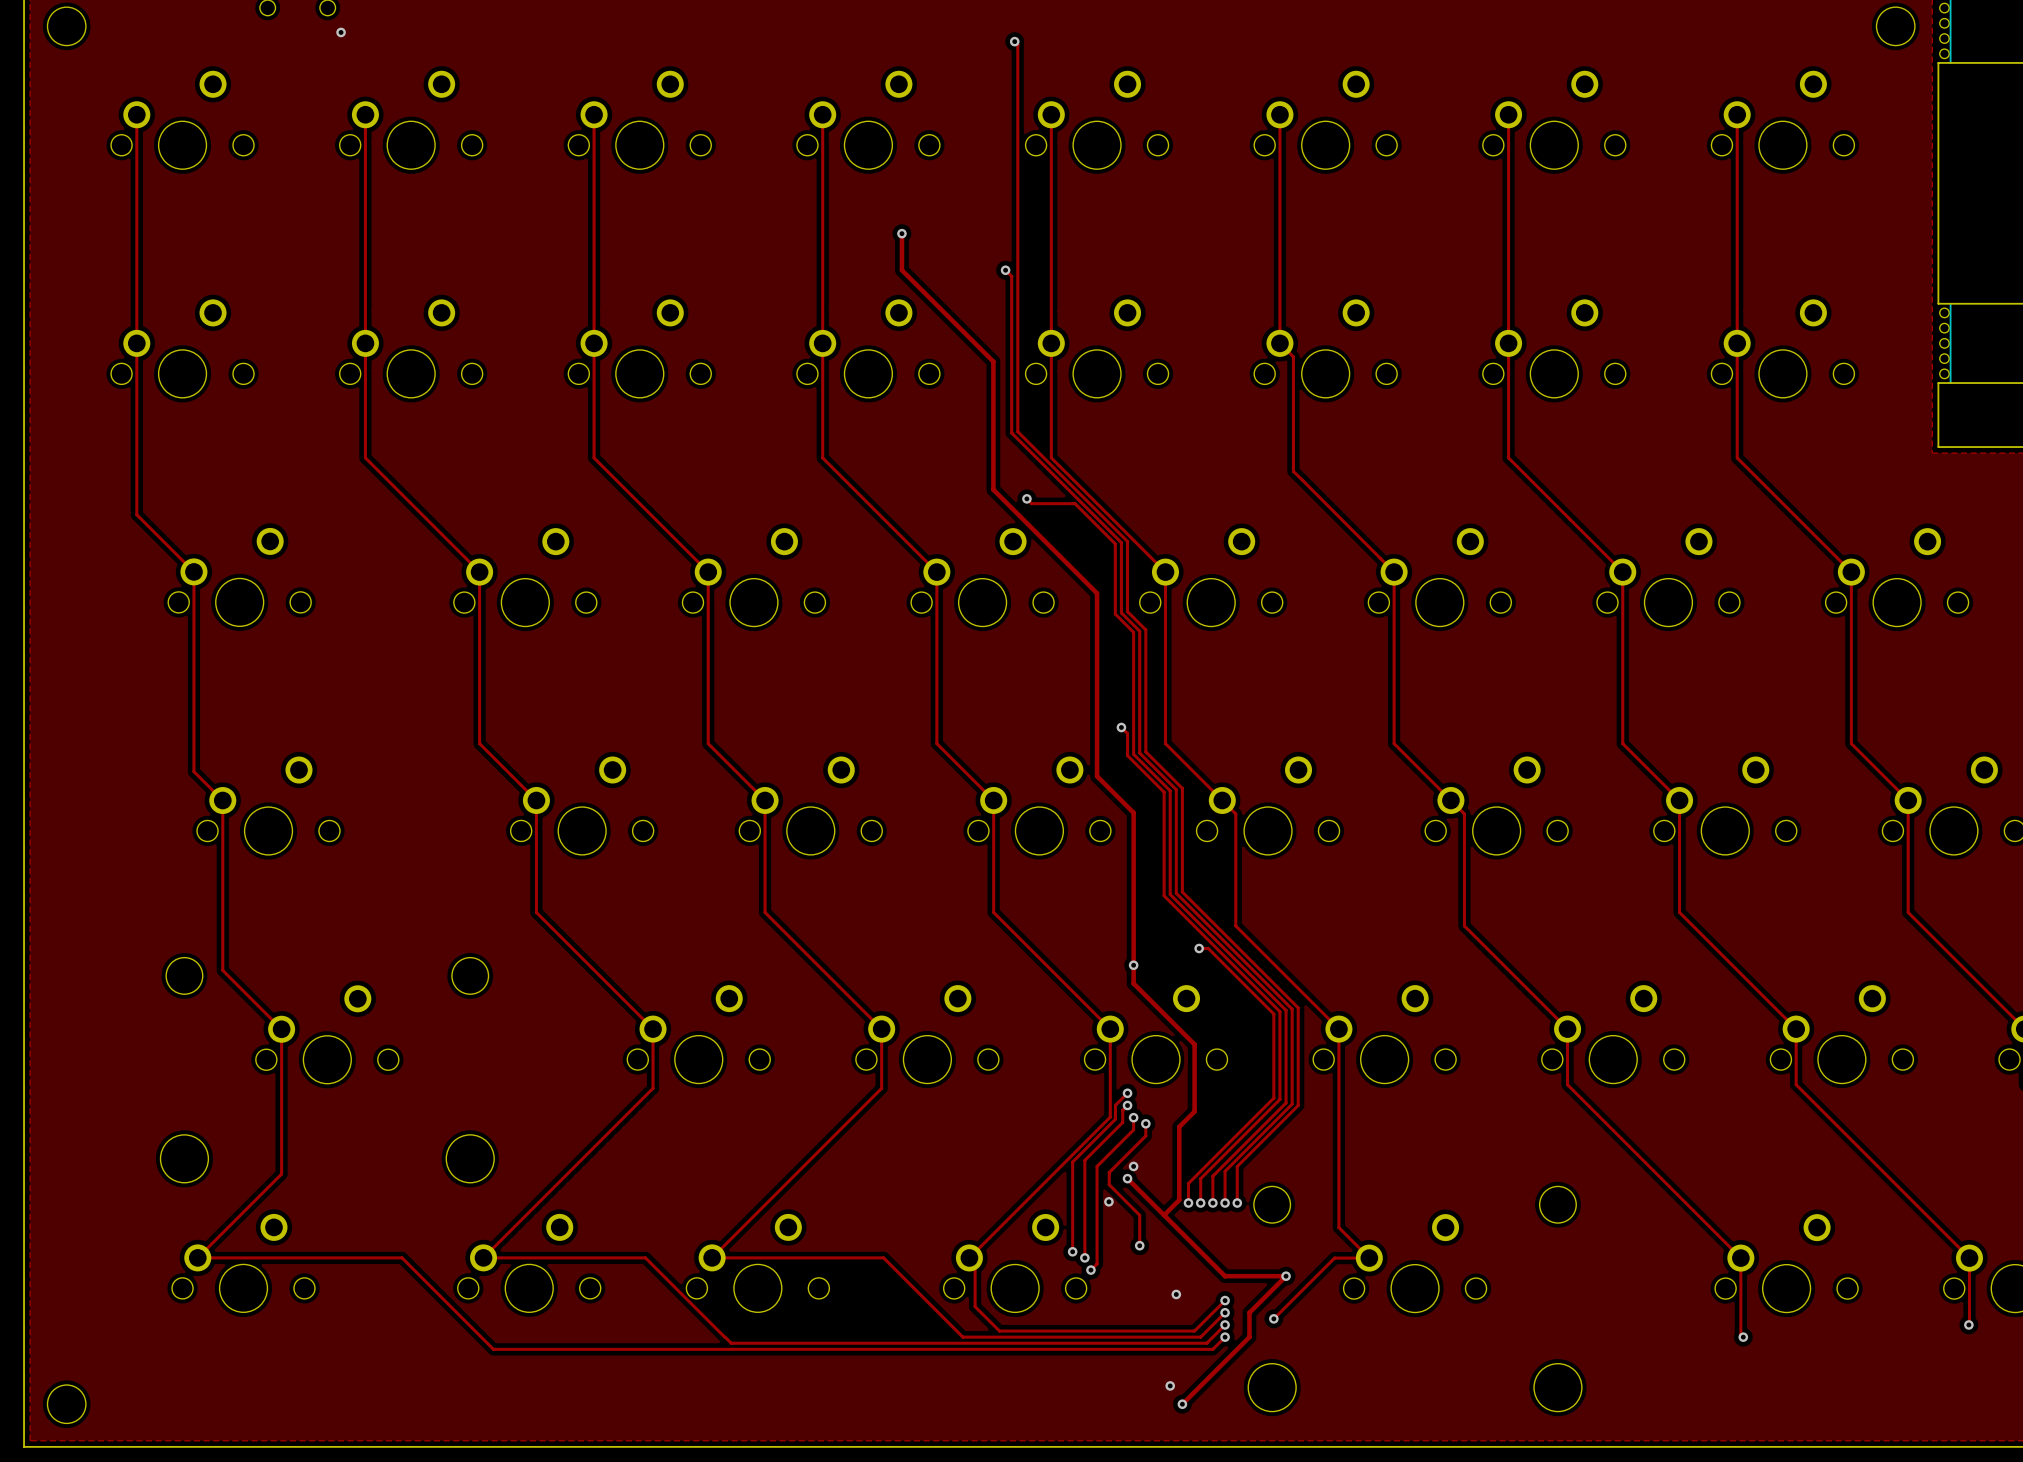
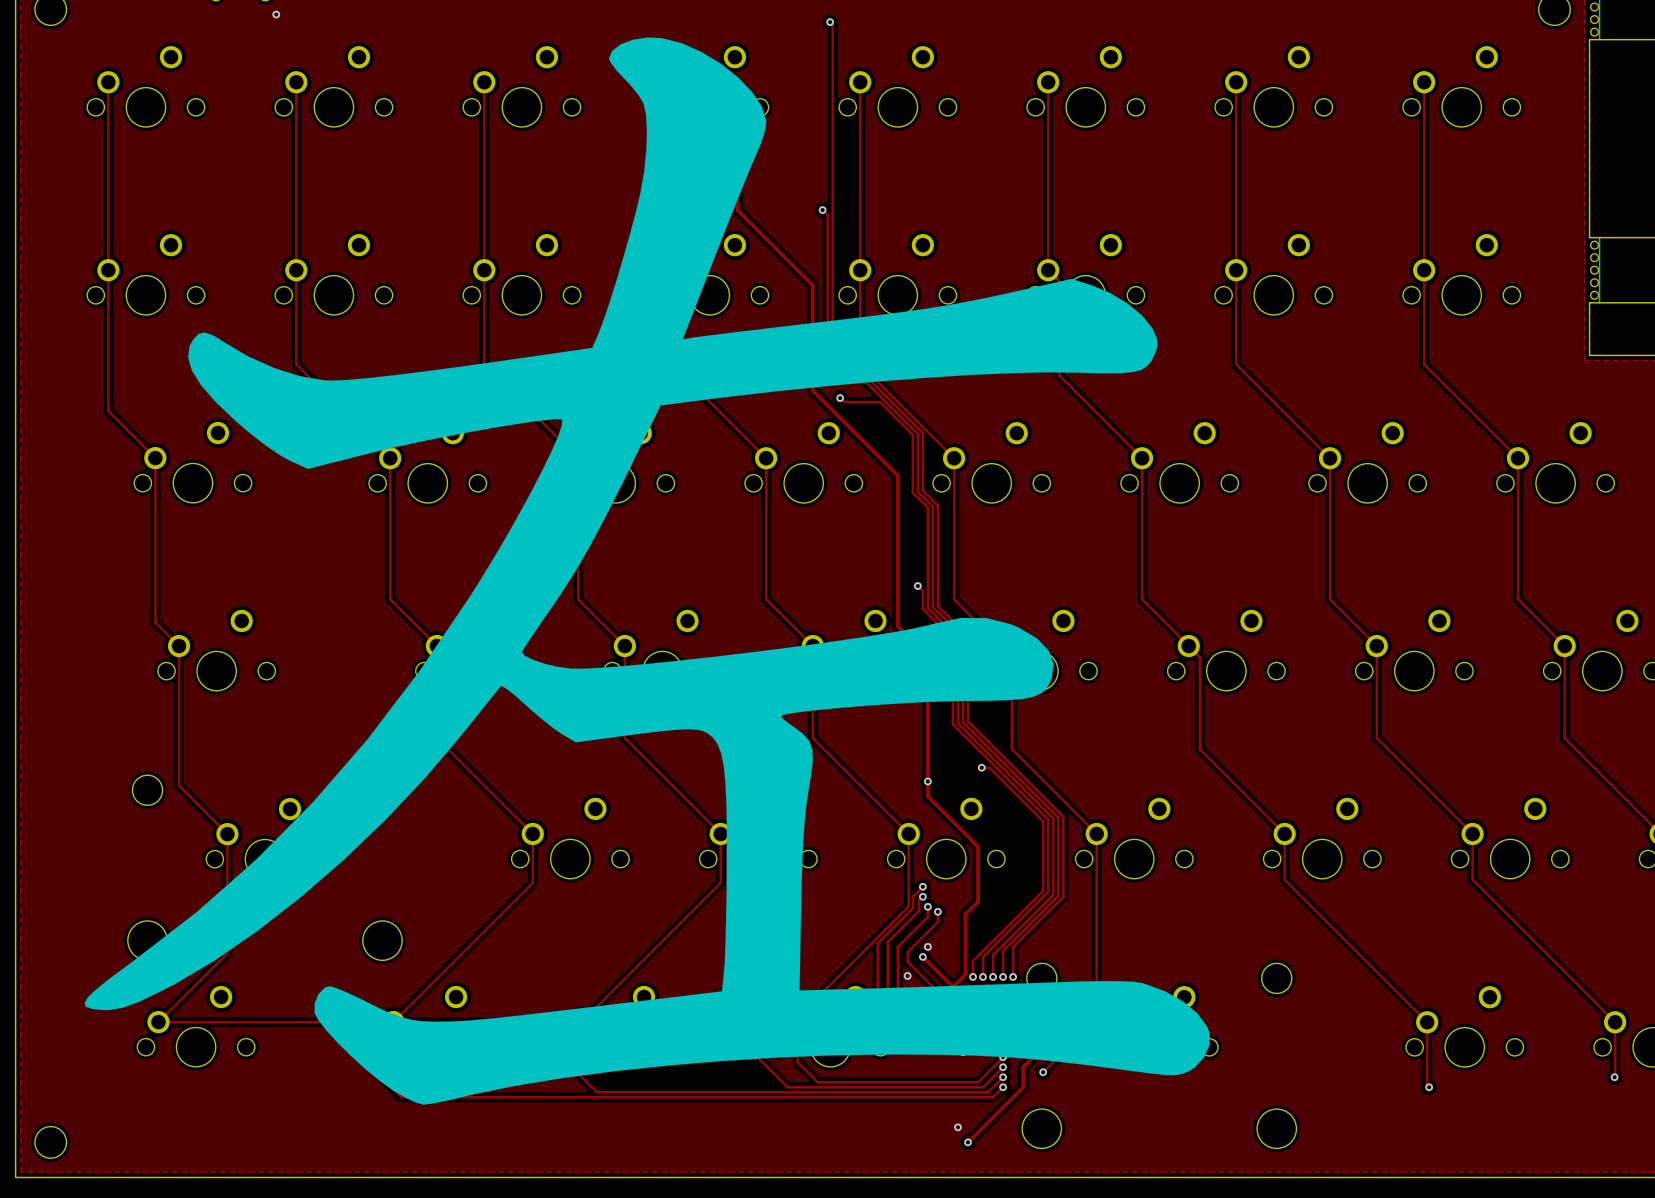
drawing: none -> [84, 37, 1210, 1105]

